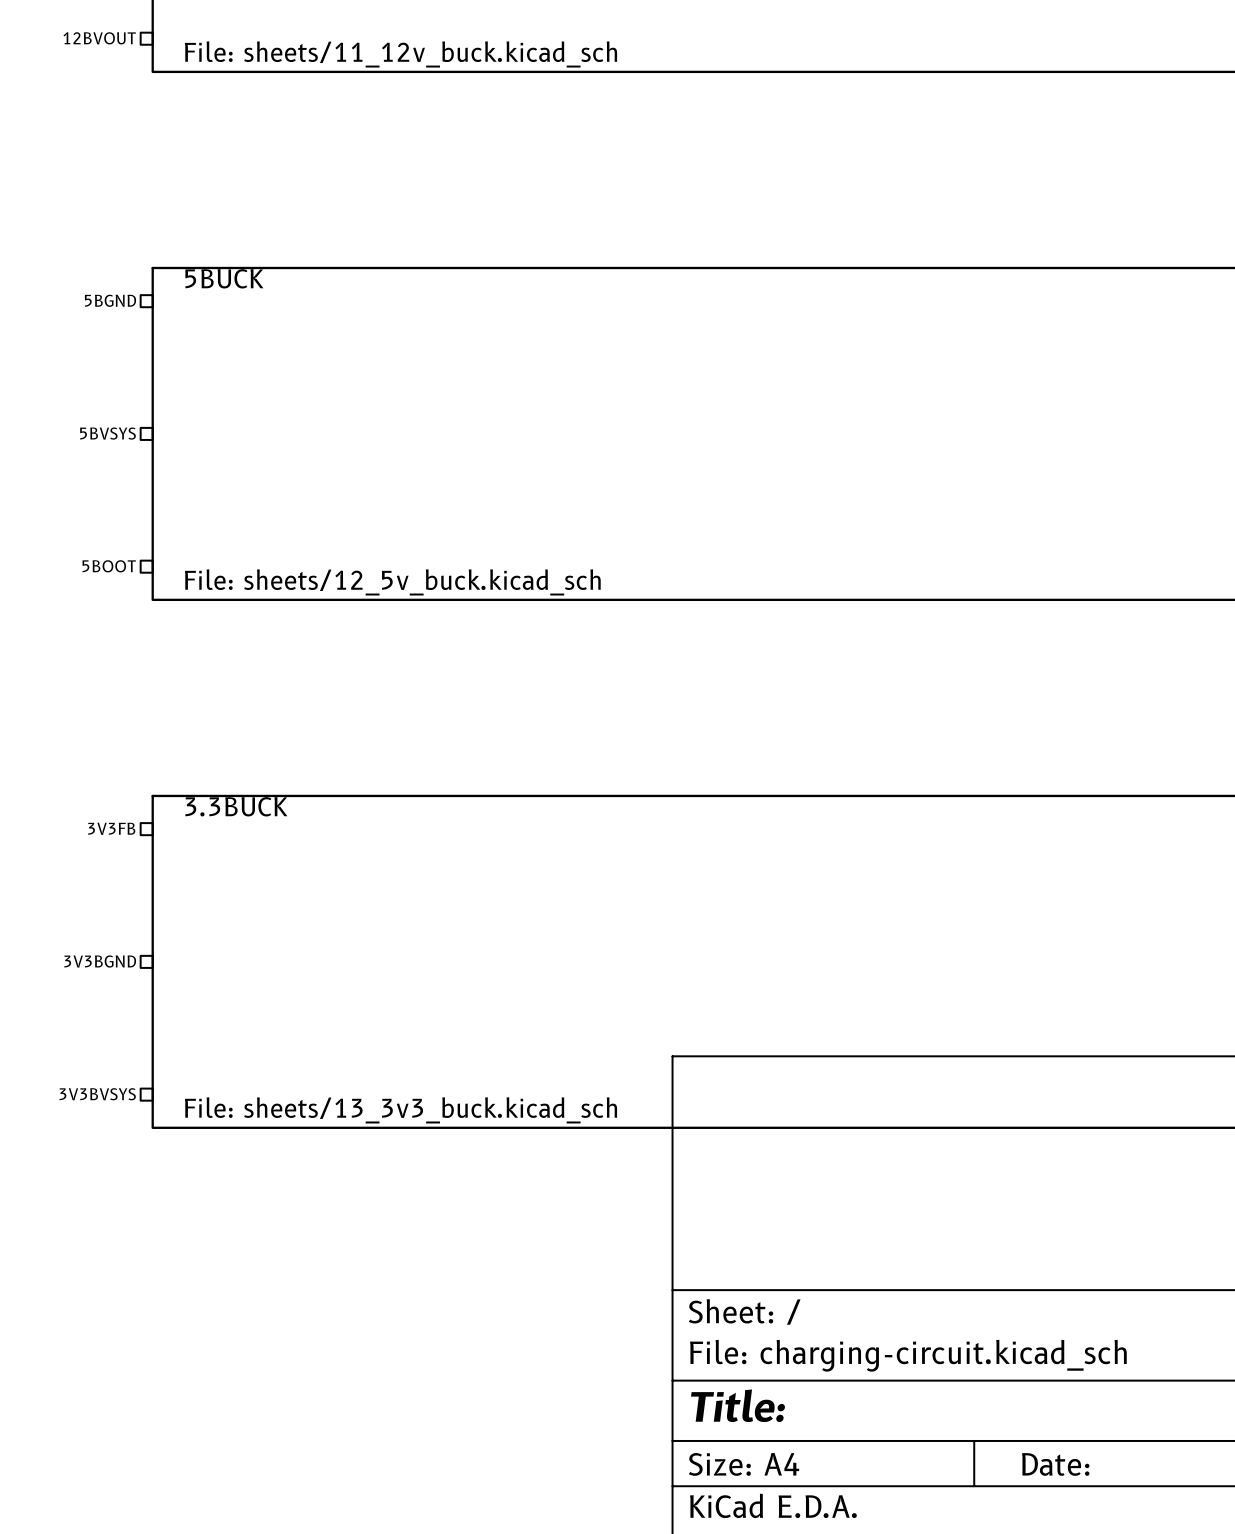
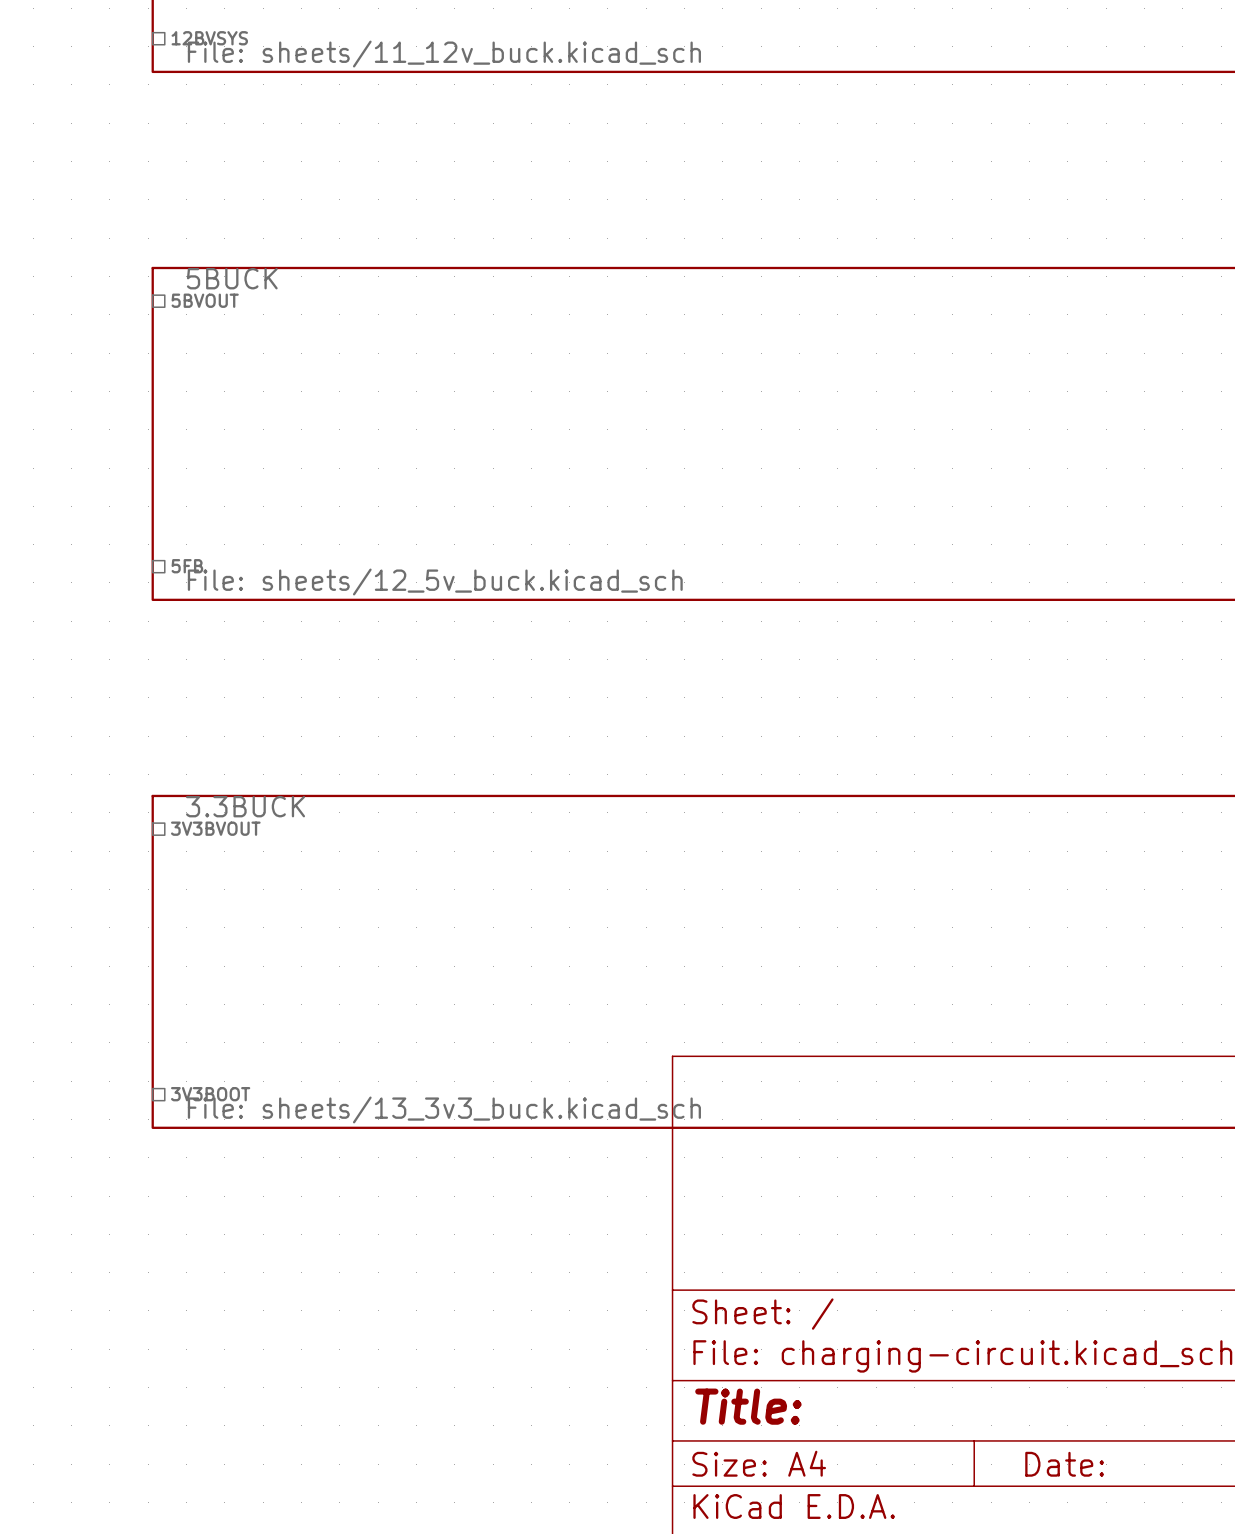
sheet pin: 12BVOUT (99, 38) -> none
sheet pin: none -> 12BVSYS (209, 38)
sheet pin: 5BGND (110, 300) -> none
sheet pin: none -> 5BVOUT (205, 300)
sheet pin: 5BVSYS (108, 433) -> none
sheet pin: 5BOOT (109, 566) -> none
sheet pin: none -> 5FB (187, 566)
sheet pin: 3V3FB (111, 828) -> none
sheet pin: none -> 3V3BVOUT (215, 828)
sheet pin: 3V3BGND (100, 961) -> none
sheet pin: 3V3BVSYS (97, 1094) -> none
sheet pin: none -> 3V3BOOT (210, 1094)

